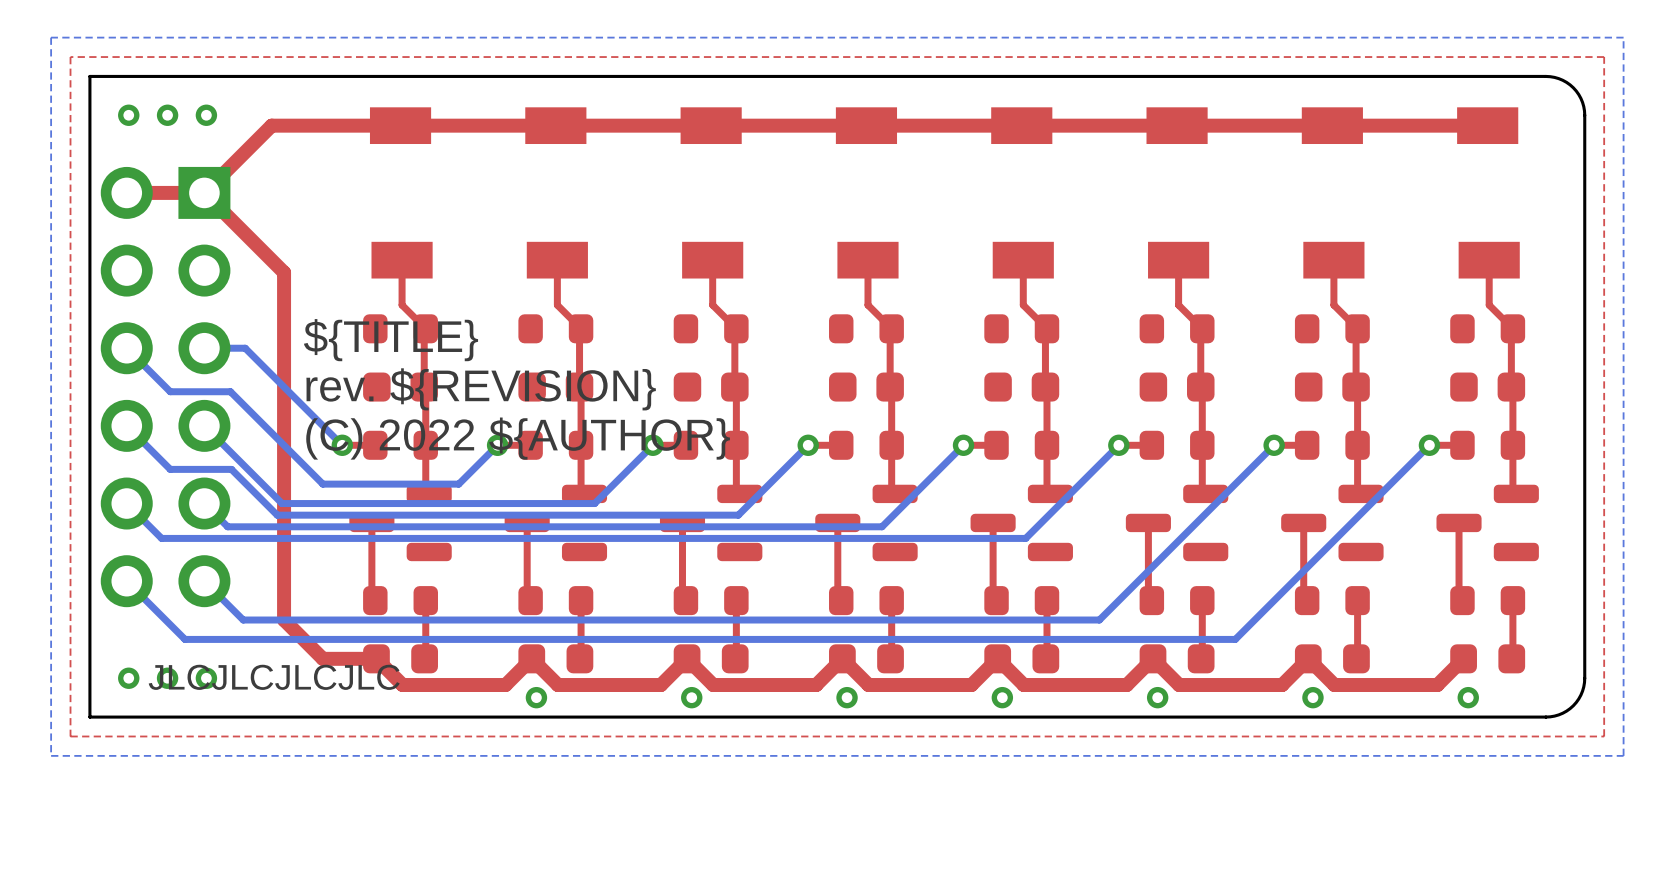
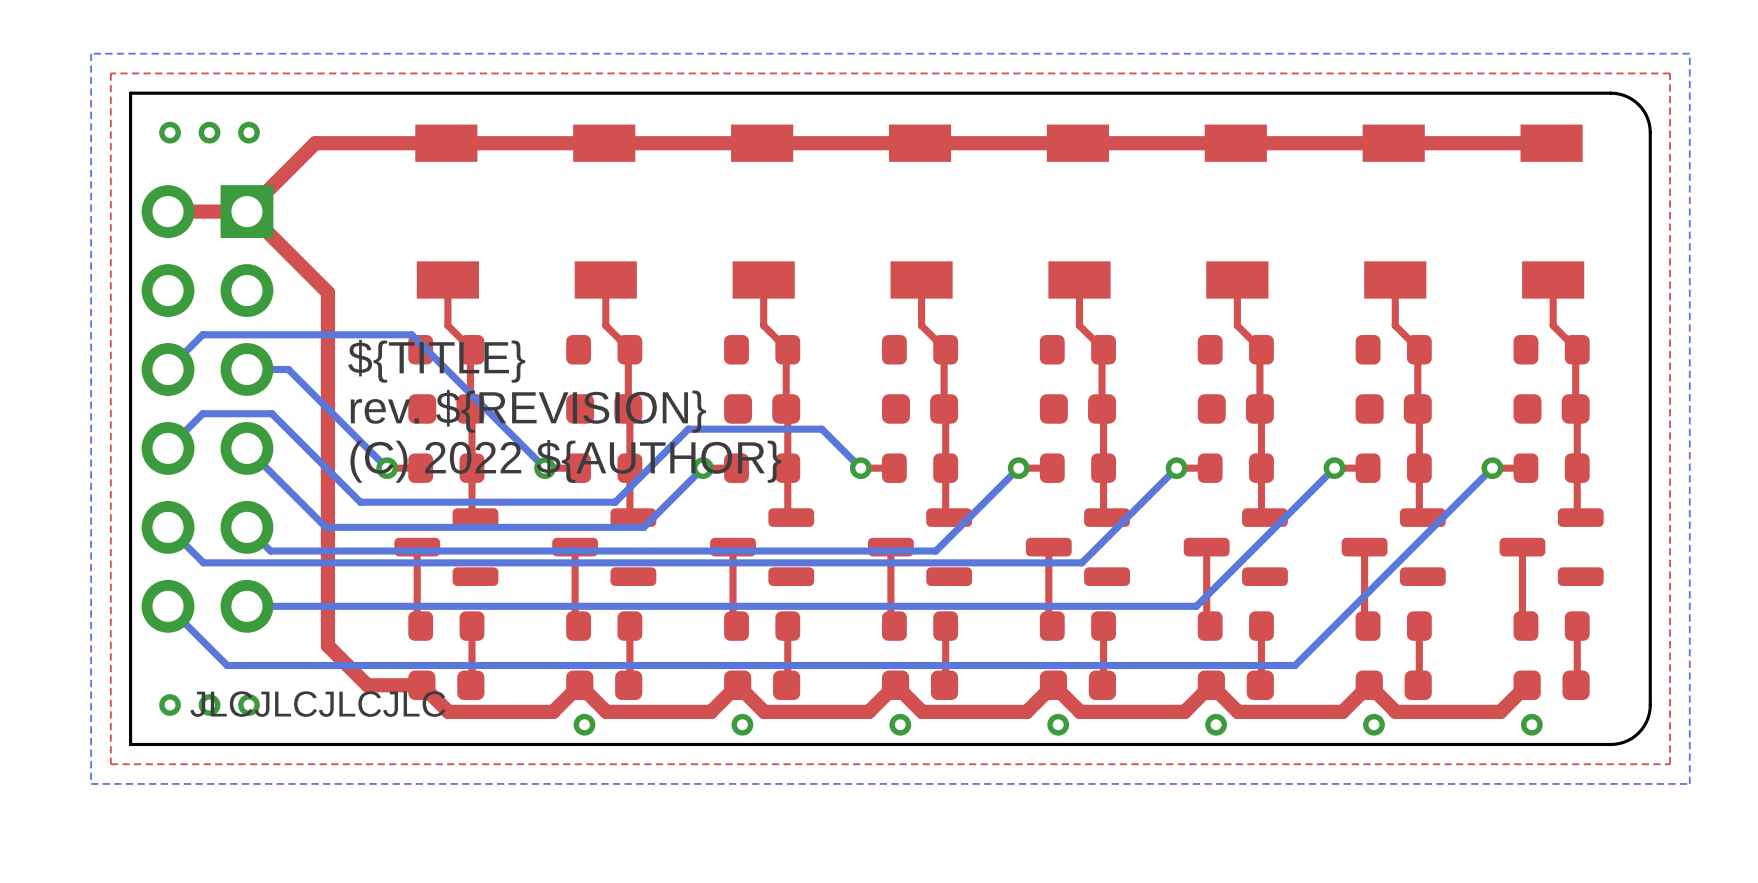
bottom track: (126, 348) (170, 391) -> (168, 448) (202, 413) (212, 413)
bottom track: (228, 391) (322, 484) (458, 484) (497, 445) -> (168, 369) (202, 334) (411, 334) (545, 468)
bottom track: (126, 425) (170, 469) (231, 469) (277, 515) (738, 515) (808, 445) -> (271, 413) (360, 502) (615, 502) (688, 429) (821, 429) (860, 468)
bottom track: (1138, 581) (1099, 620) (243, 620) (204, 581) -> (1196, 606) (246, 606)

